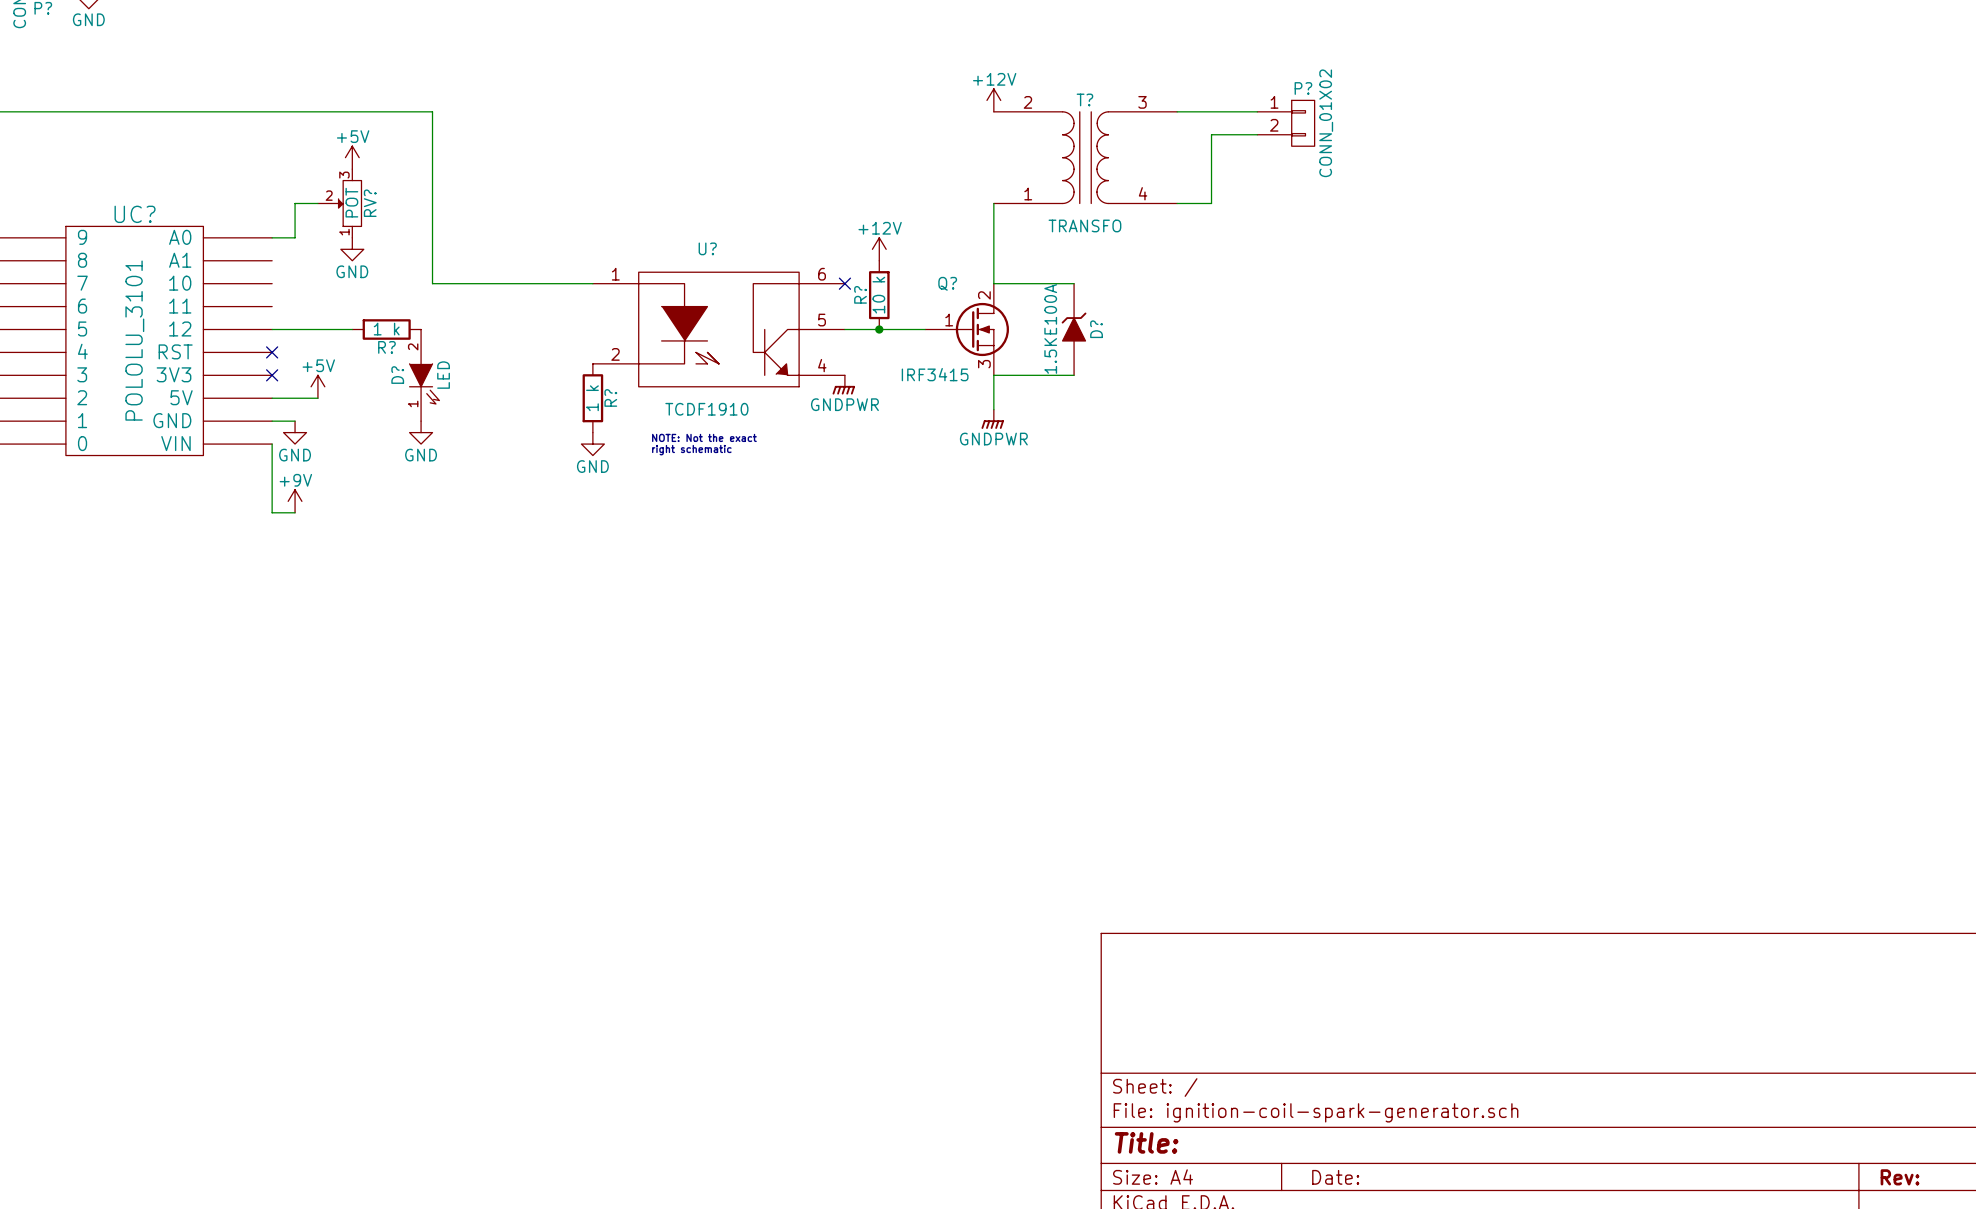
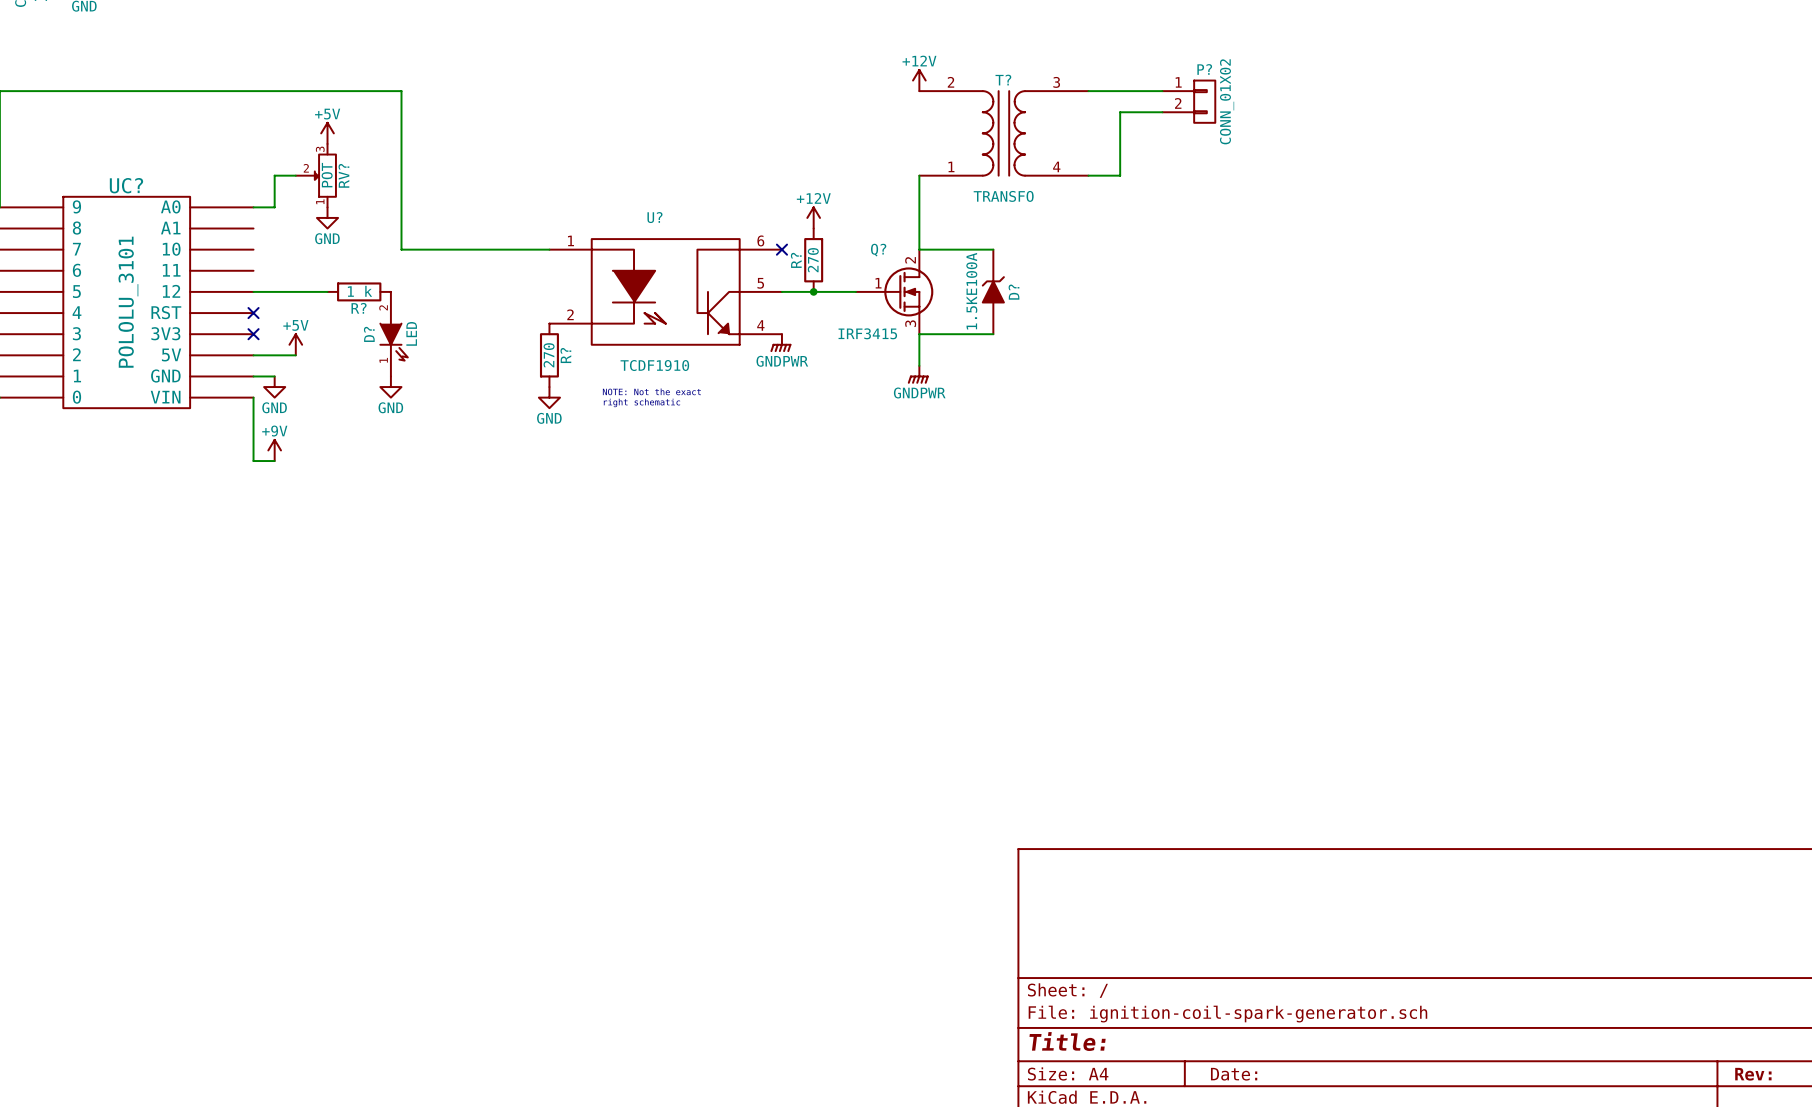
R? value: 10 k (878, 295) -> 270 (813, 260)
R? value: 1 k (592, 398) -> 270 (549, 355)

